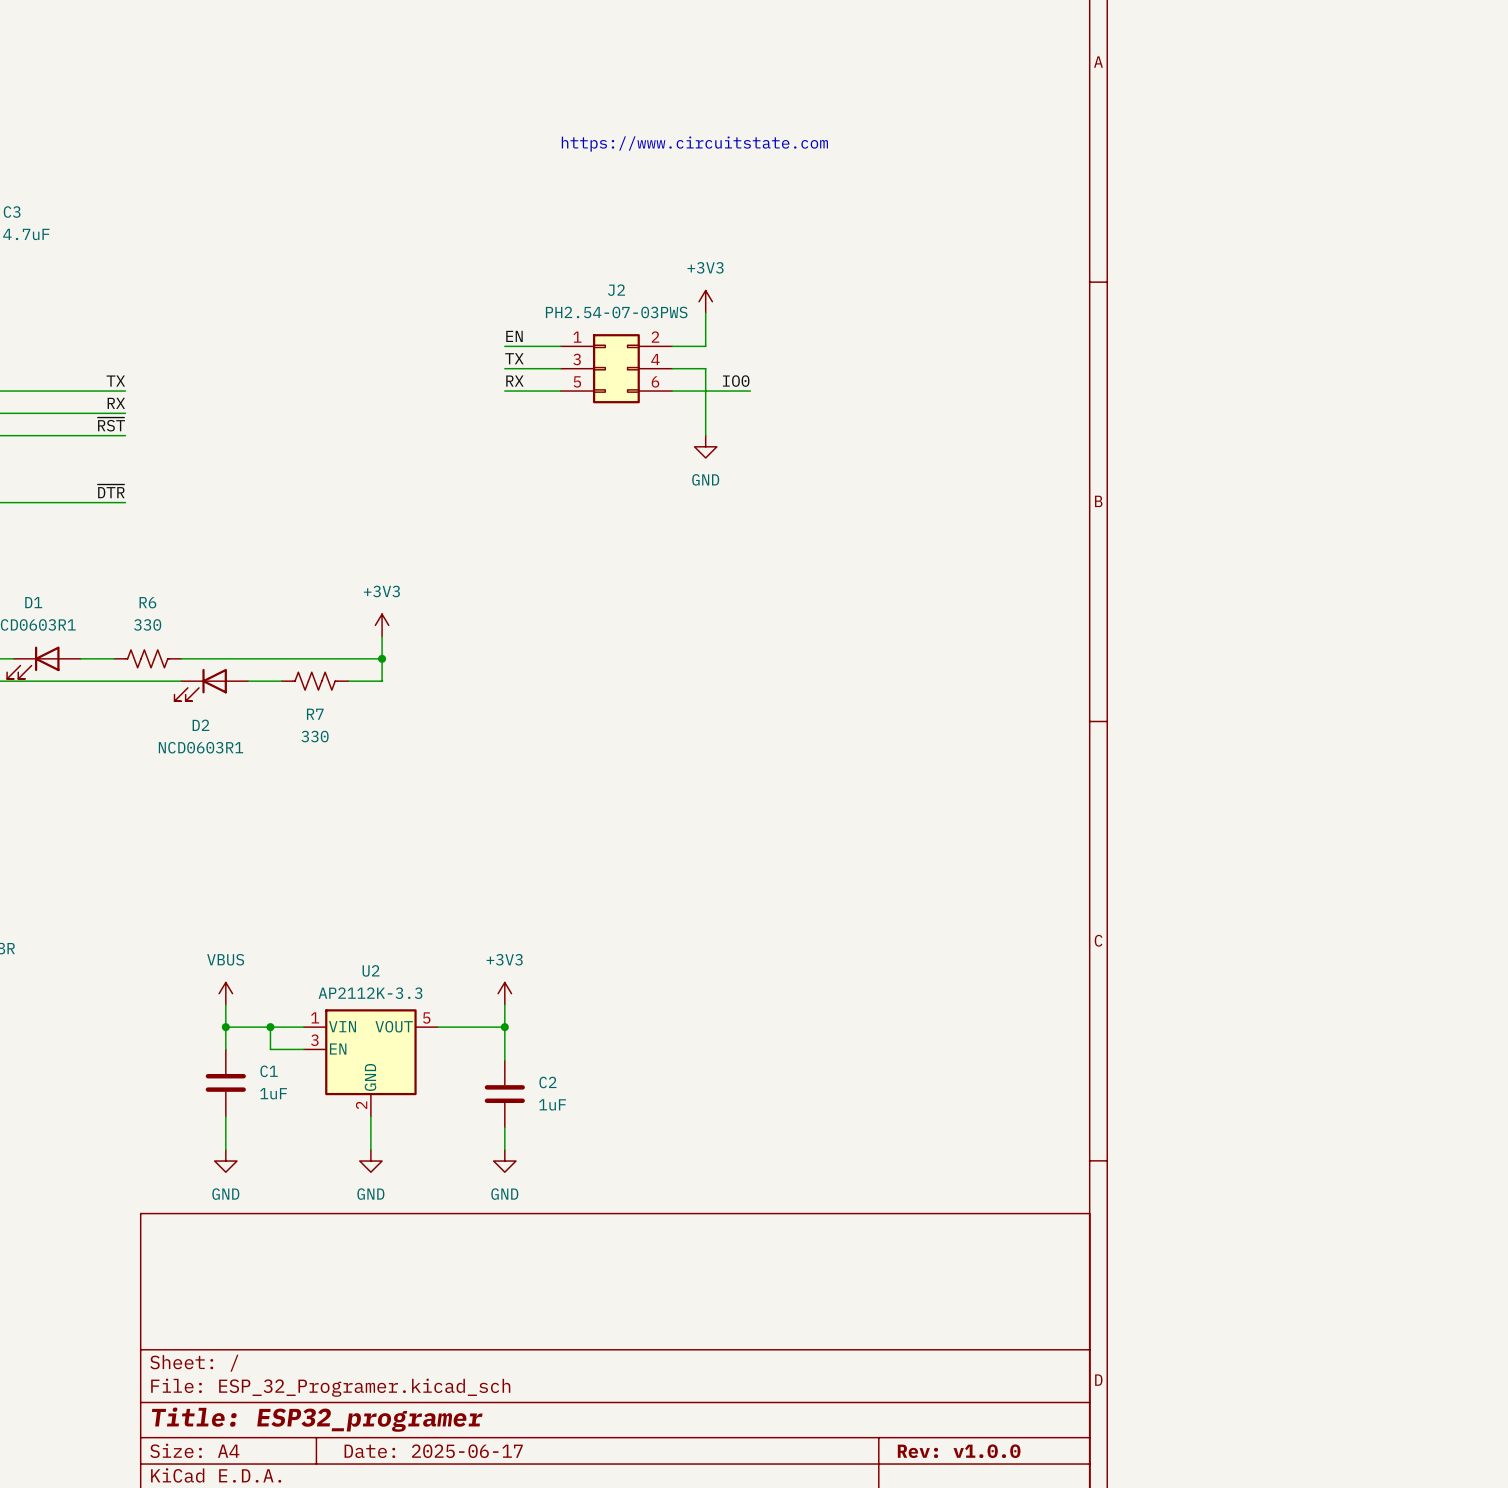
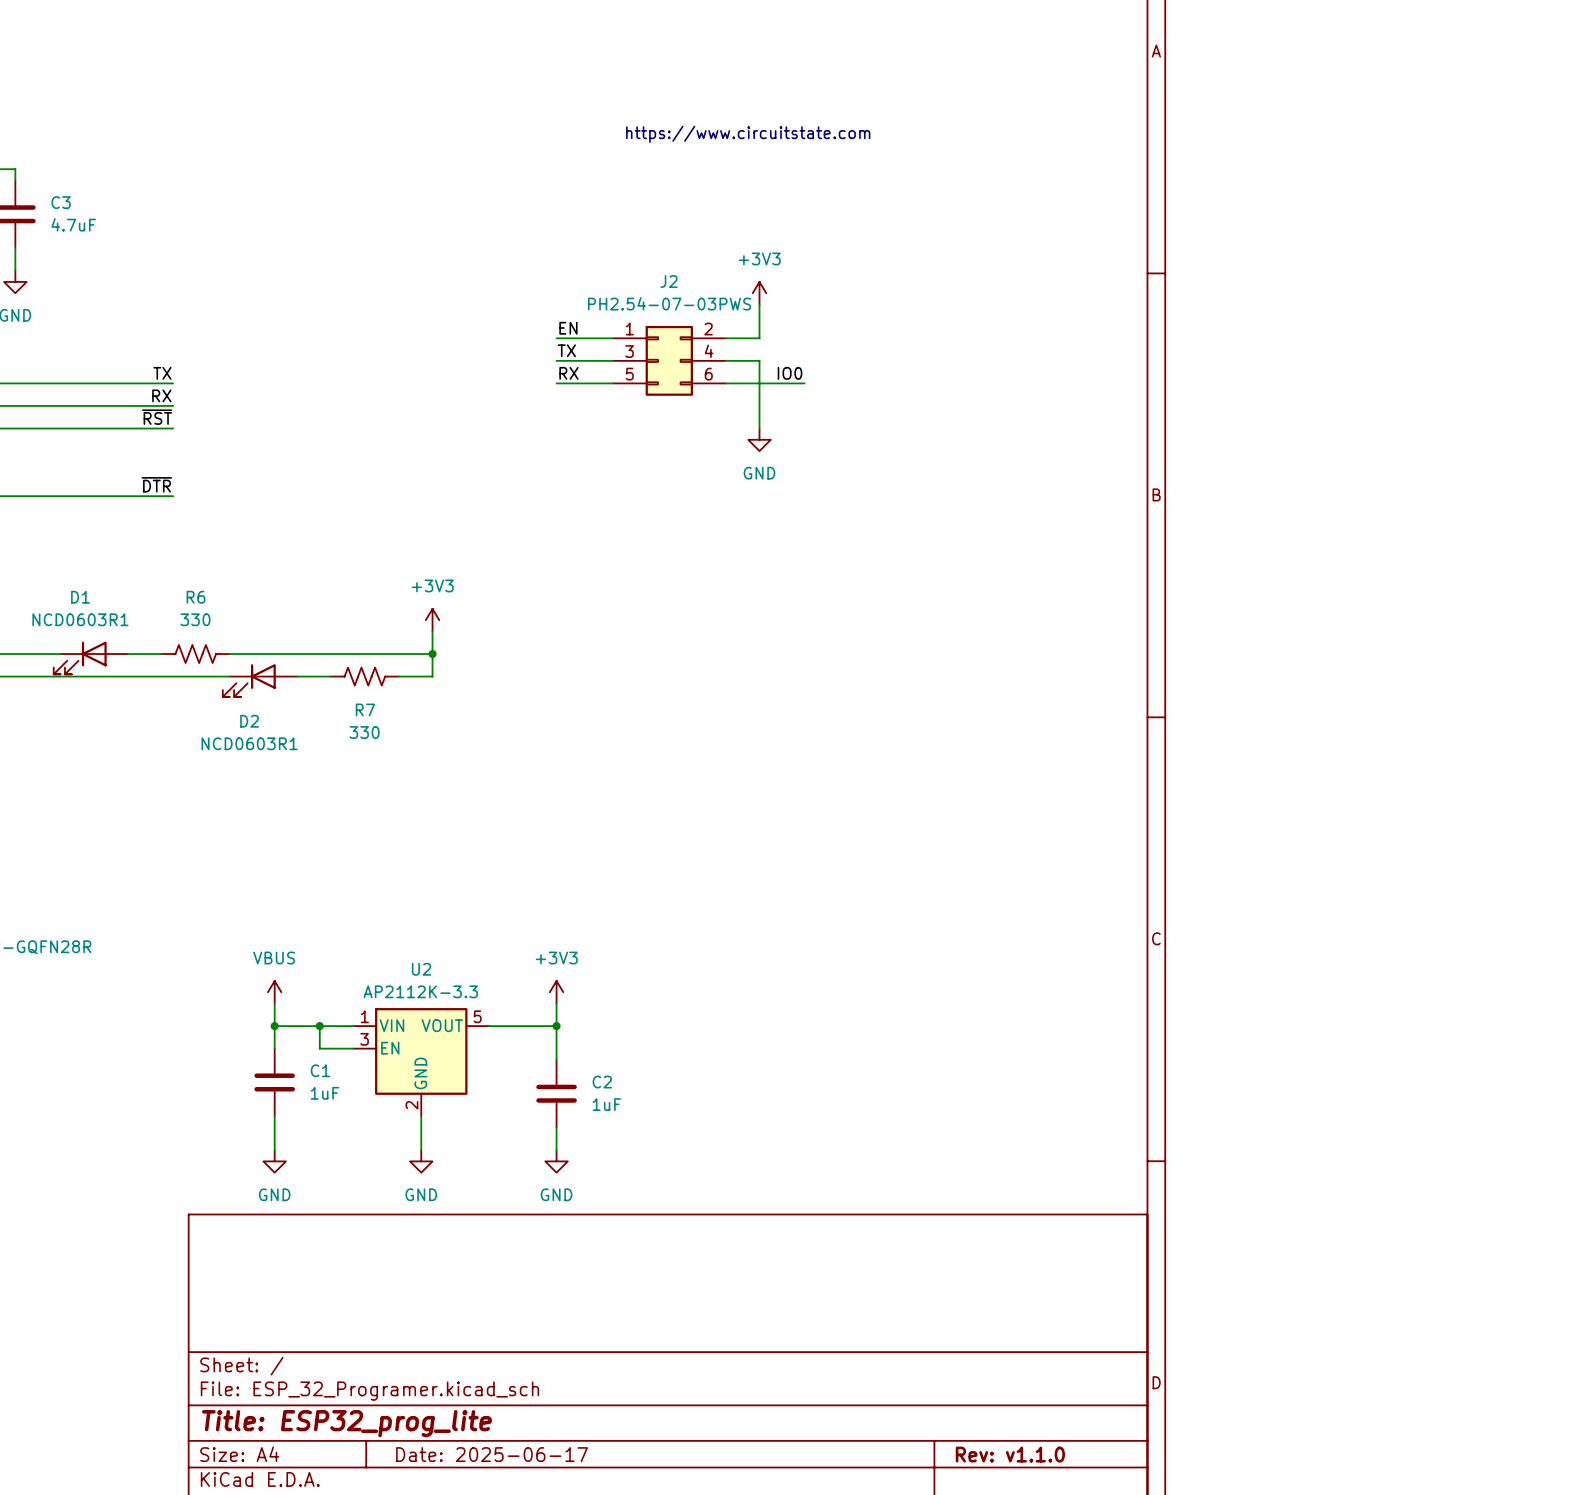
title block: Title: ESP32_programer (317, 1419) -> Title: ESP32_prog_lite (346, 1423)
title block: Rev: v1.0.0 (959, 1451) -> Rev: v1.1.0 (1010, 1454)

